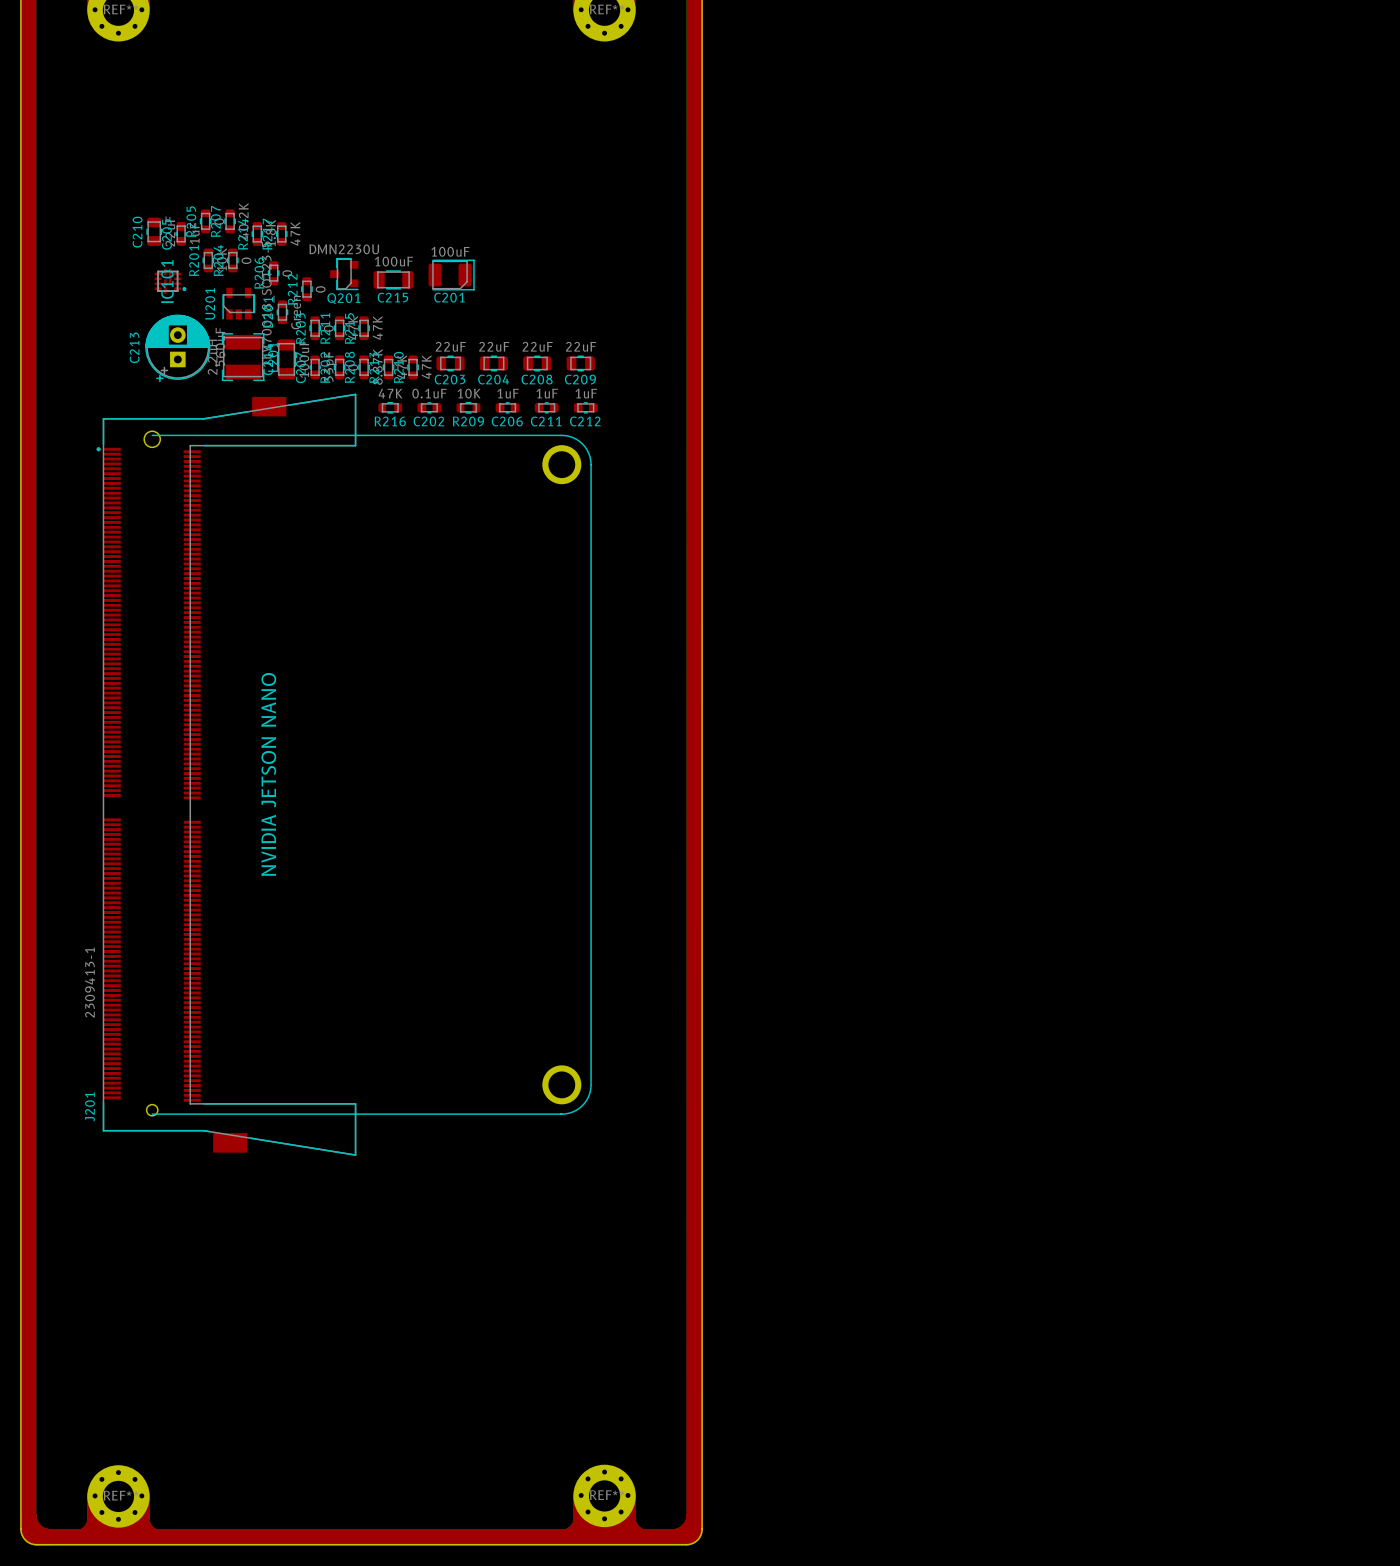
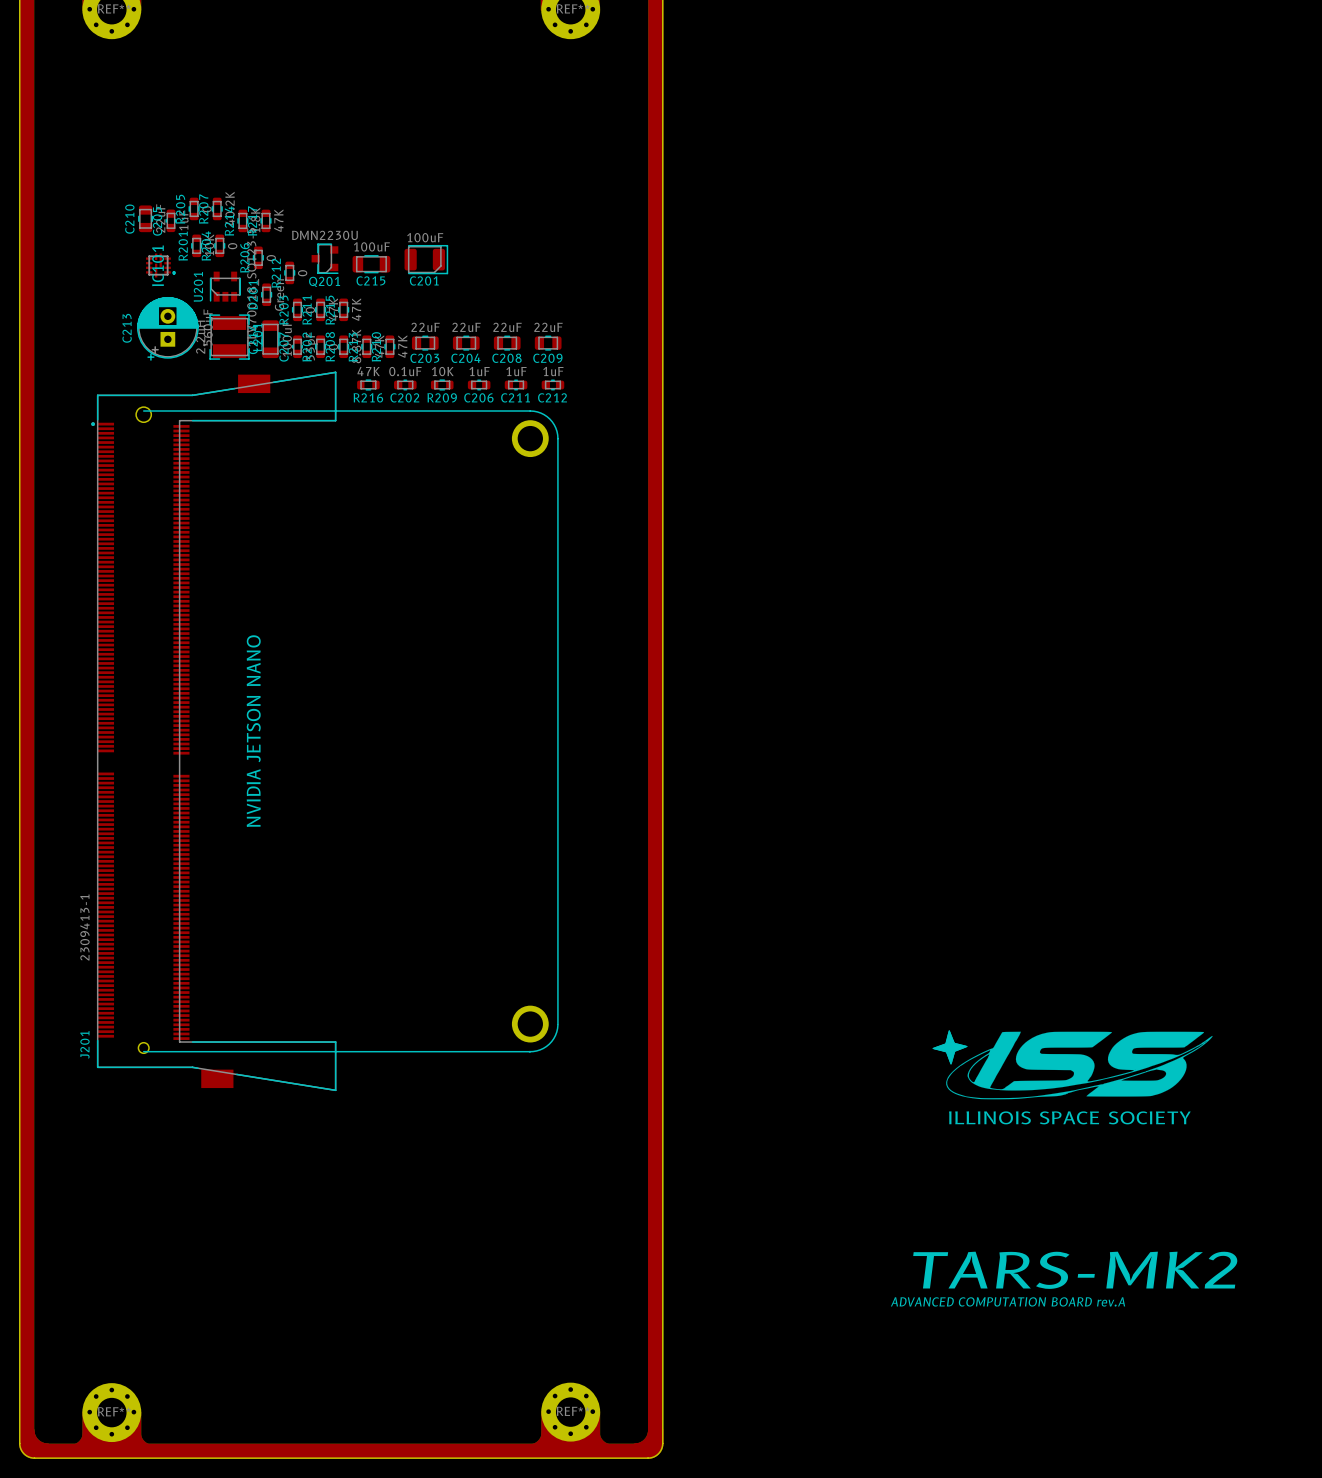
drawing: none -> [932, 1030, 1213, 1100]
text: none -> ILLINOIS SPACE SOCIETY (1069, 1117)
text: none -> TARS-MK2 (1075, 1270)
text: none -> ADVANCED COMPUTATION BOARD rev.A (1008, 1301)

